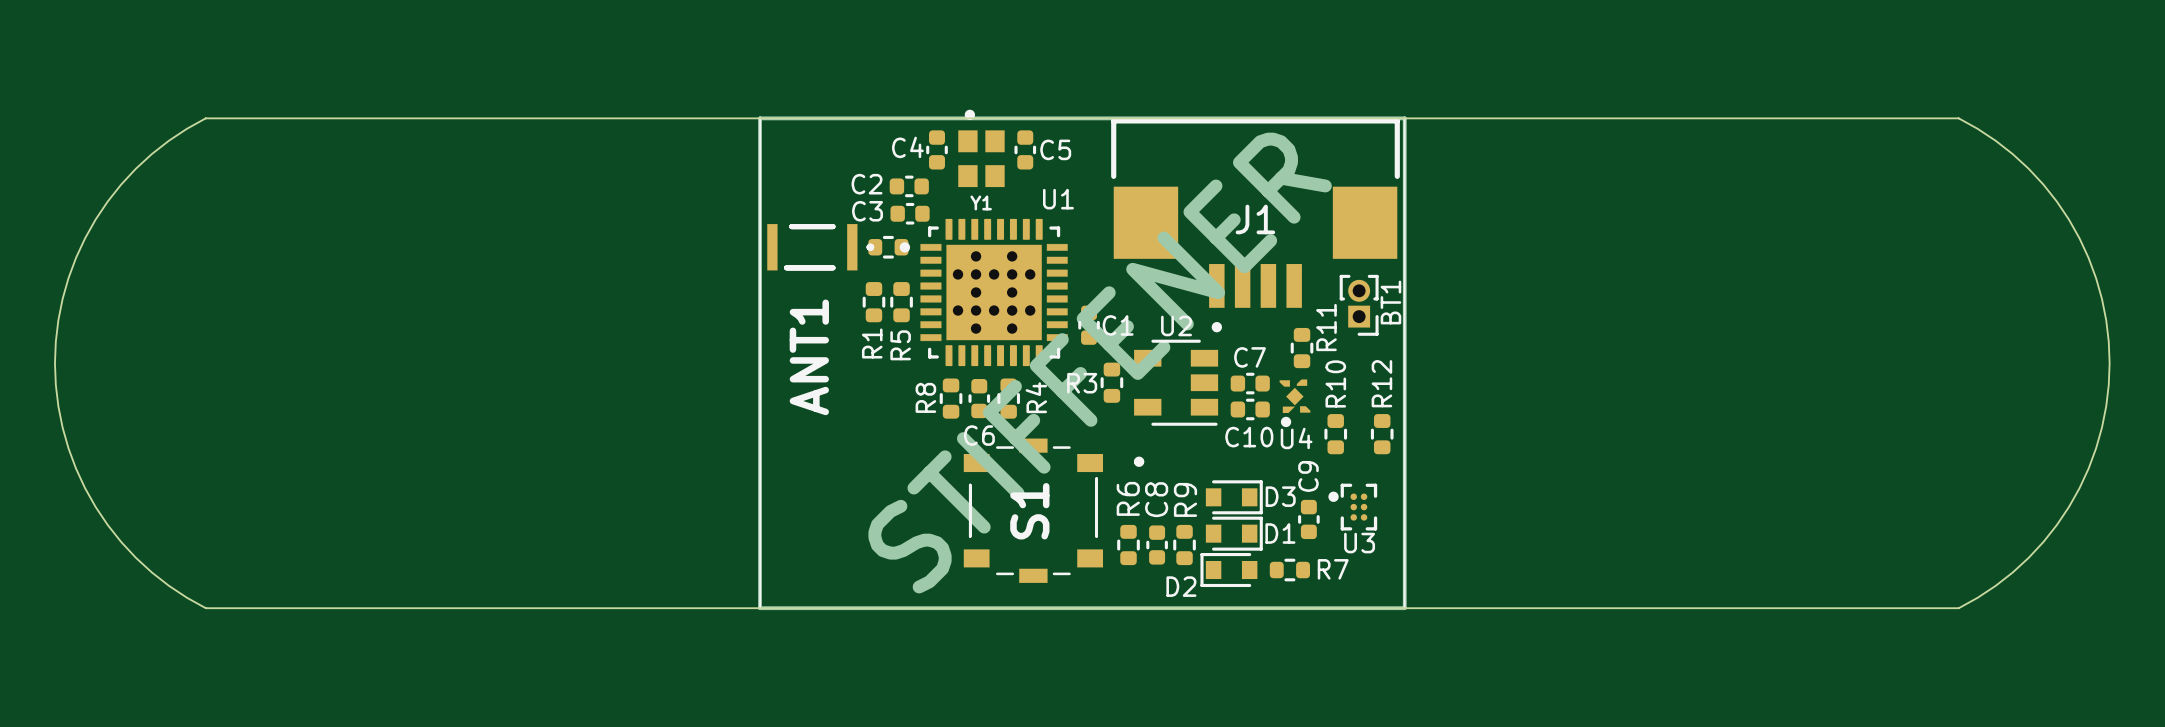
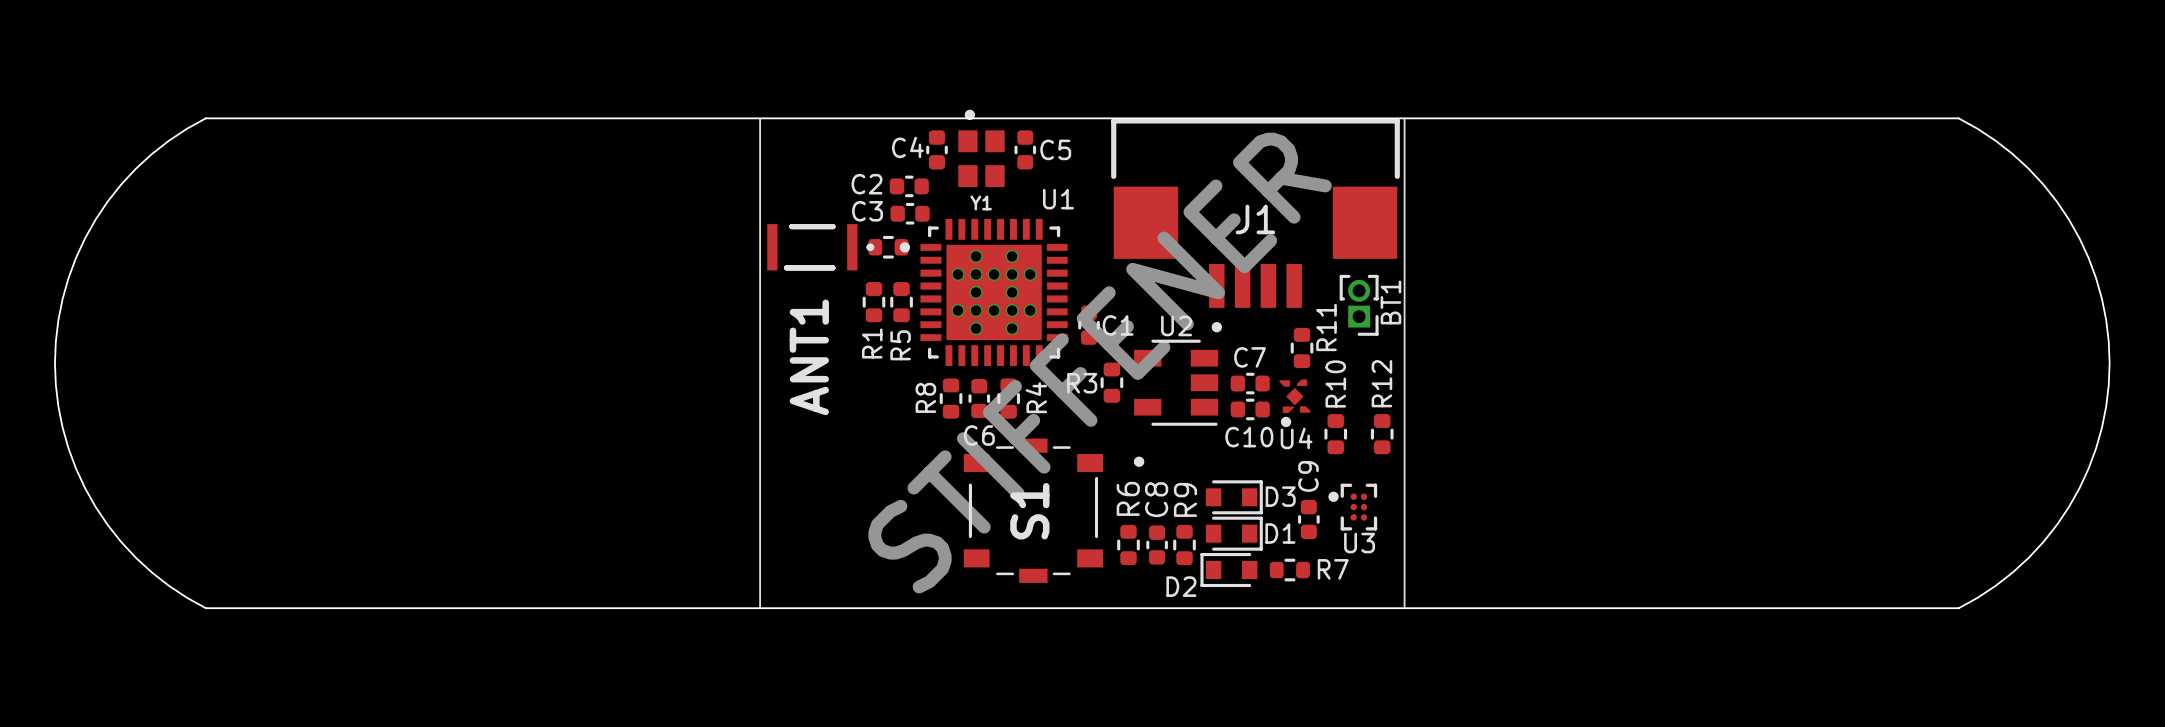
line: (760, 118) (760, 608) (1404, 608) (1404, 118) (760, 118) -> none

